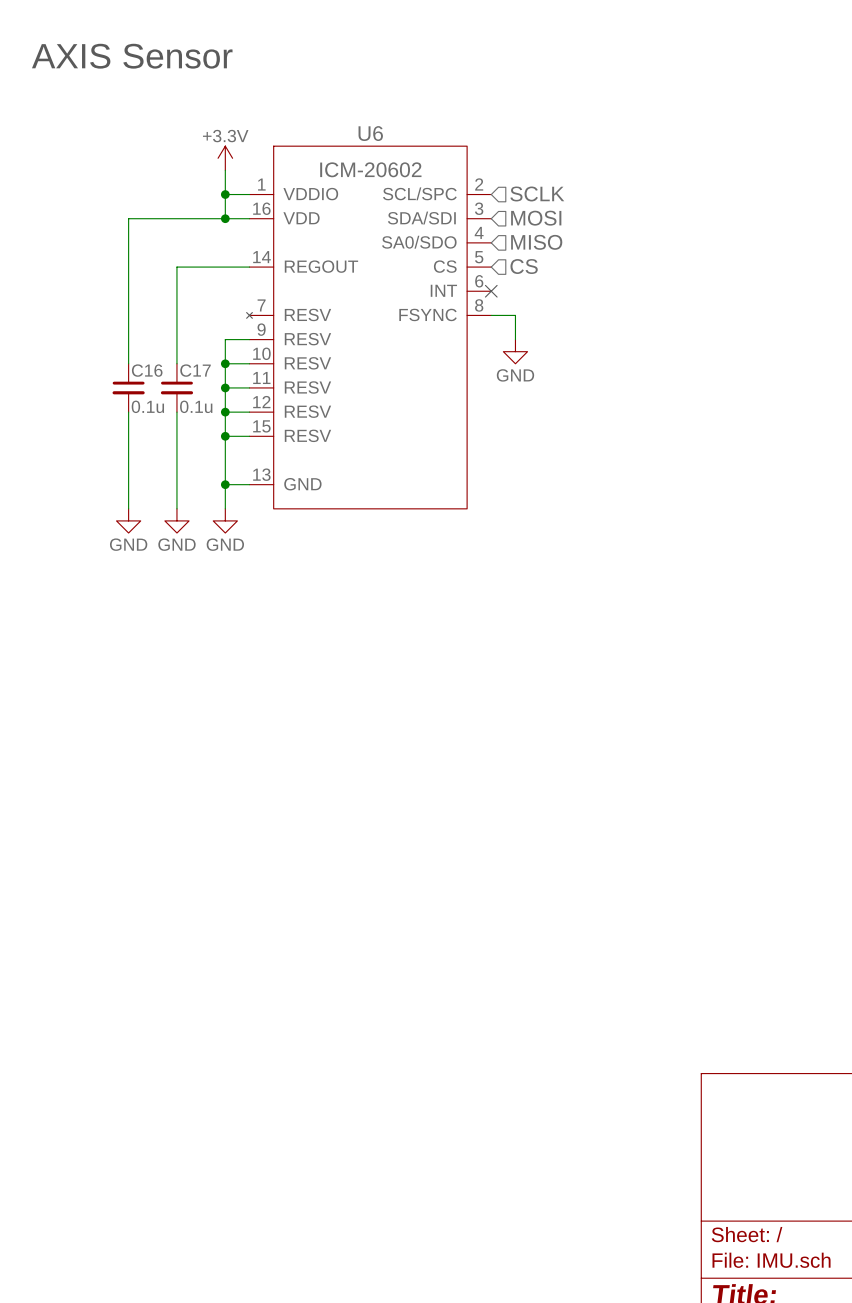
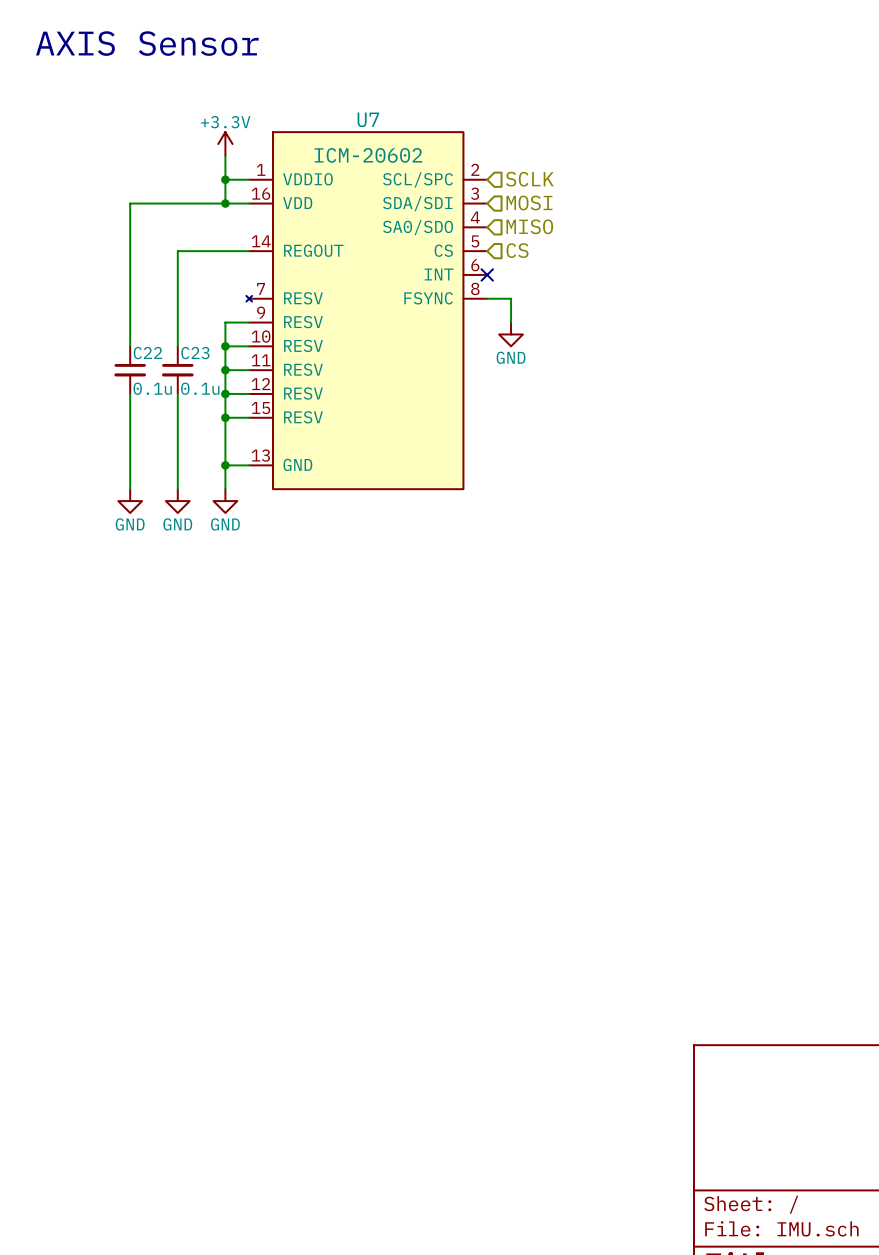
U6 name: U6 (370, 133) -> U7 (368, 119)
C16 name: C16 (147, 370) -> C22 (147, 353)
C17 name: C17 (195, 370) -> C23 (195, 353)

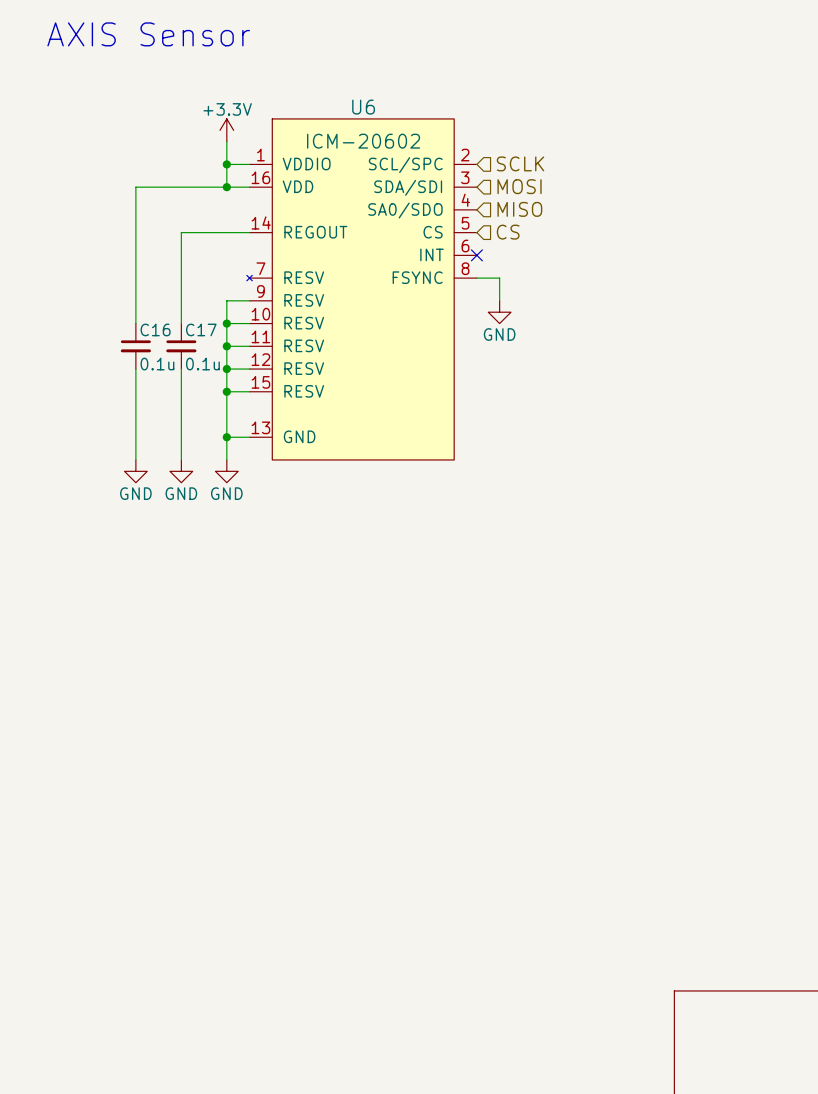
U7 name: U7 (368, 119) -> U6 (363, 107)
C22 name: C22 (147, 353) -> C16 (155, 329)
C23 name: C23 (195, 353) -> C17 (201, 329)

